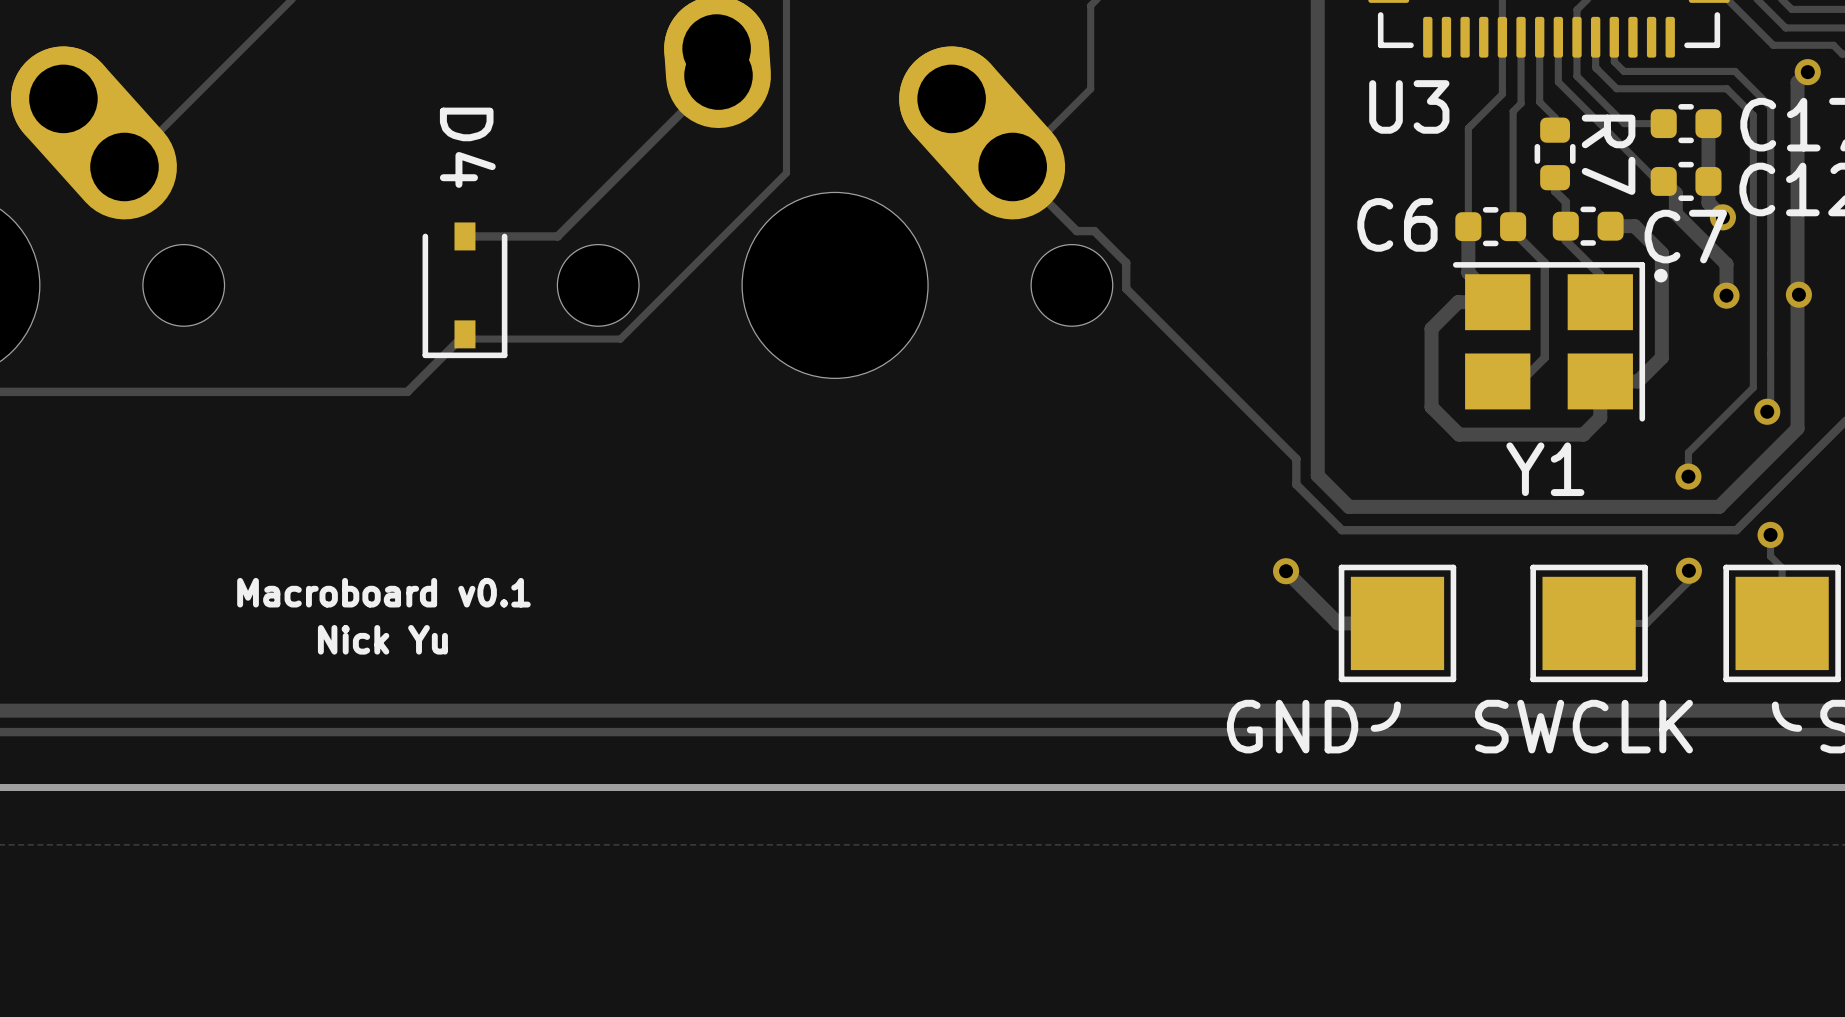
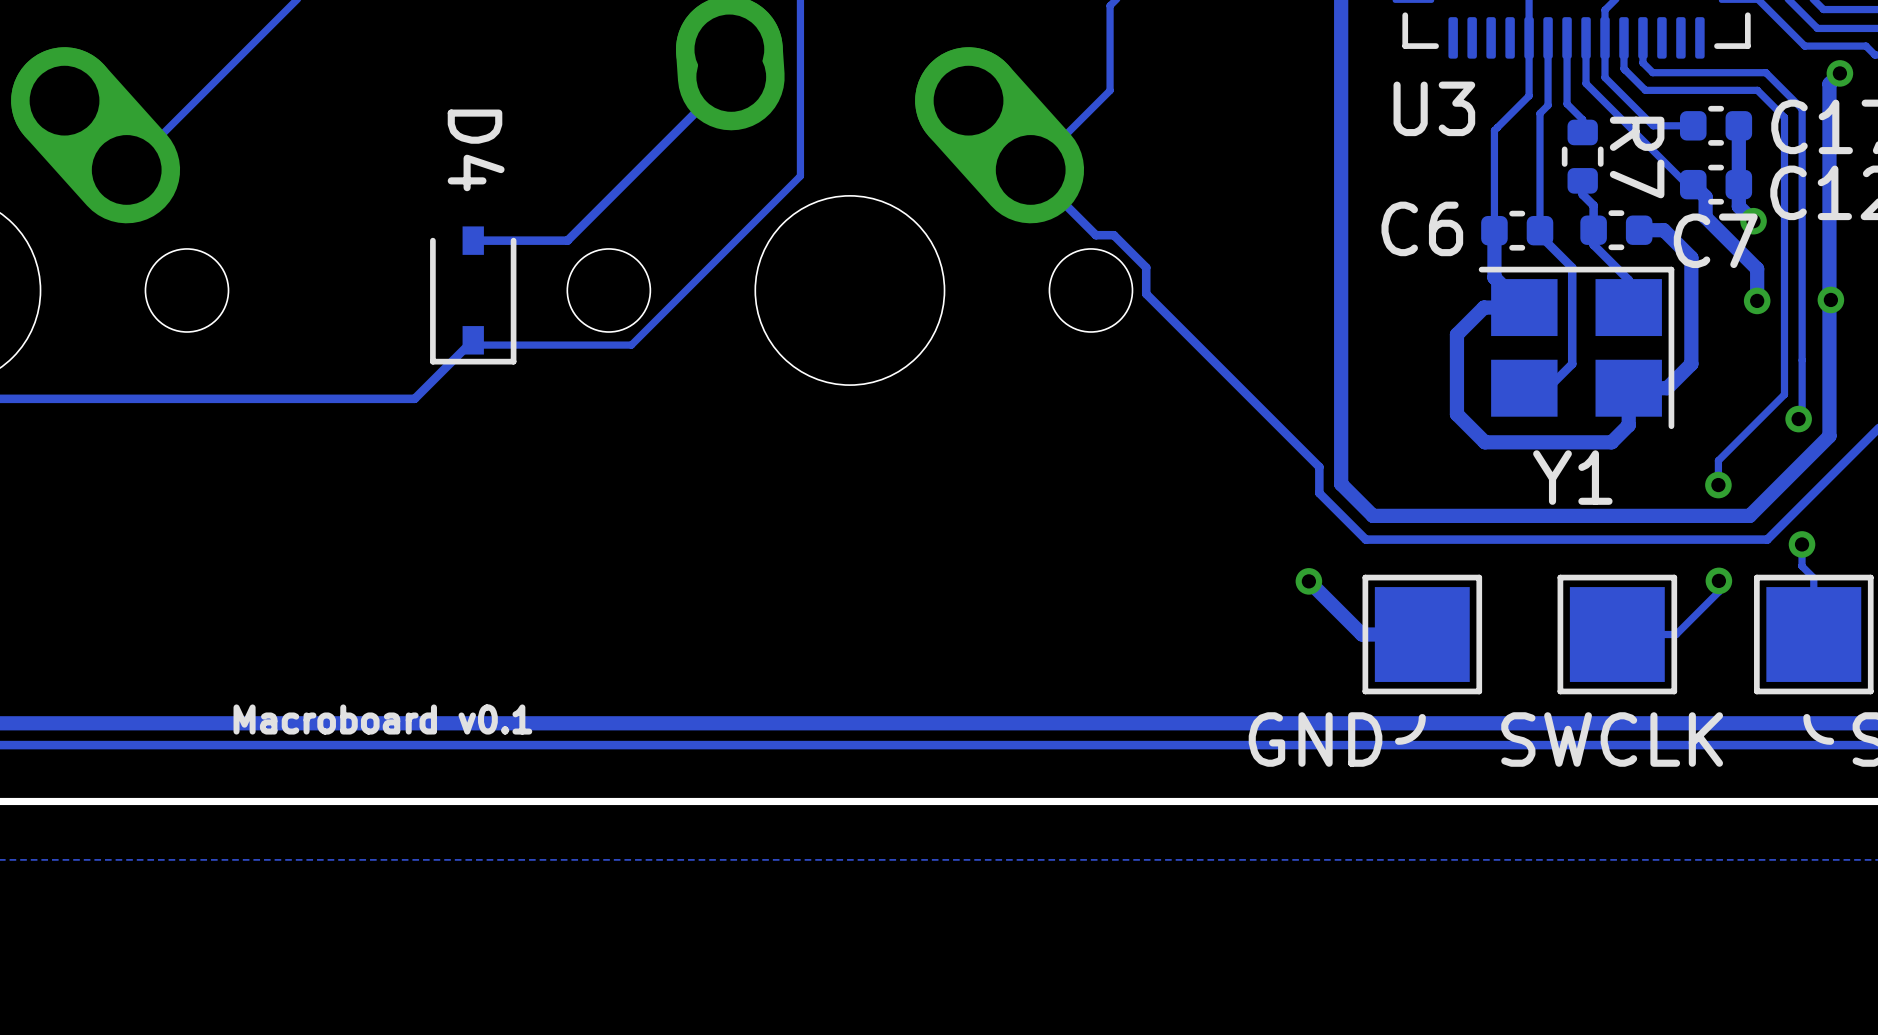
drawing: [1654, 268, 1668, 283] -> none
text position: Macroboard v0.1 (383, 592) -> Macroboard v0.1 (382, 719)
text: Nick Yu (382, 639) -> none

